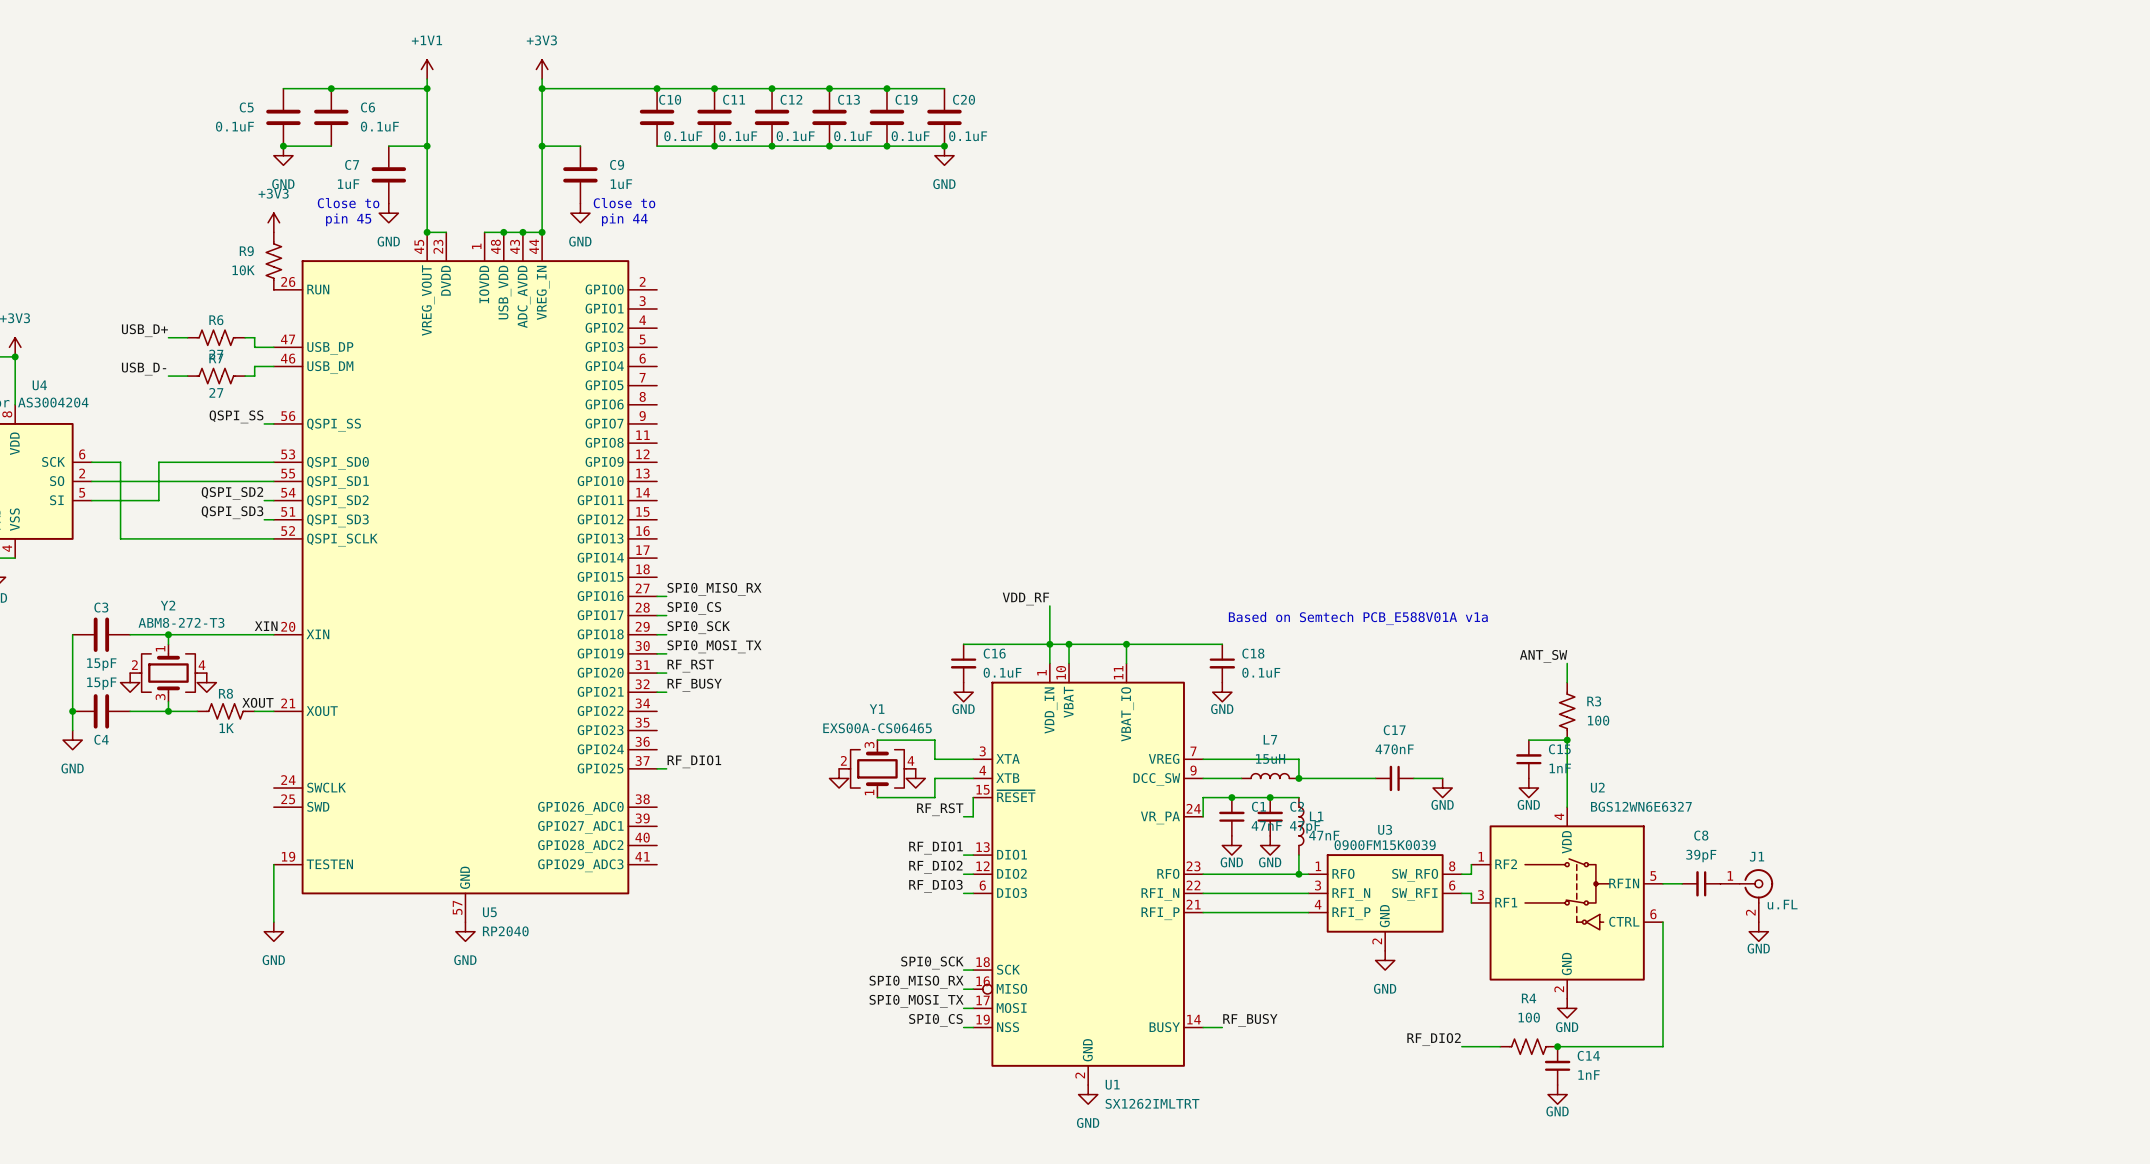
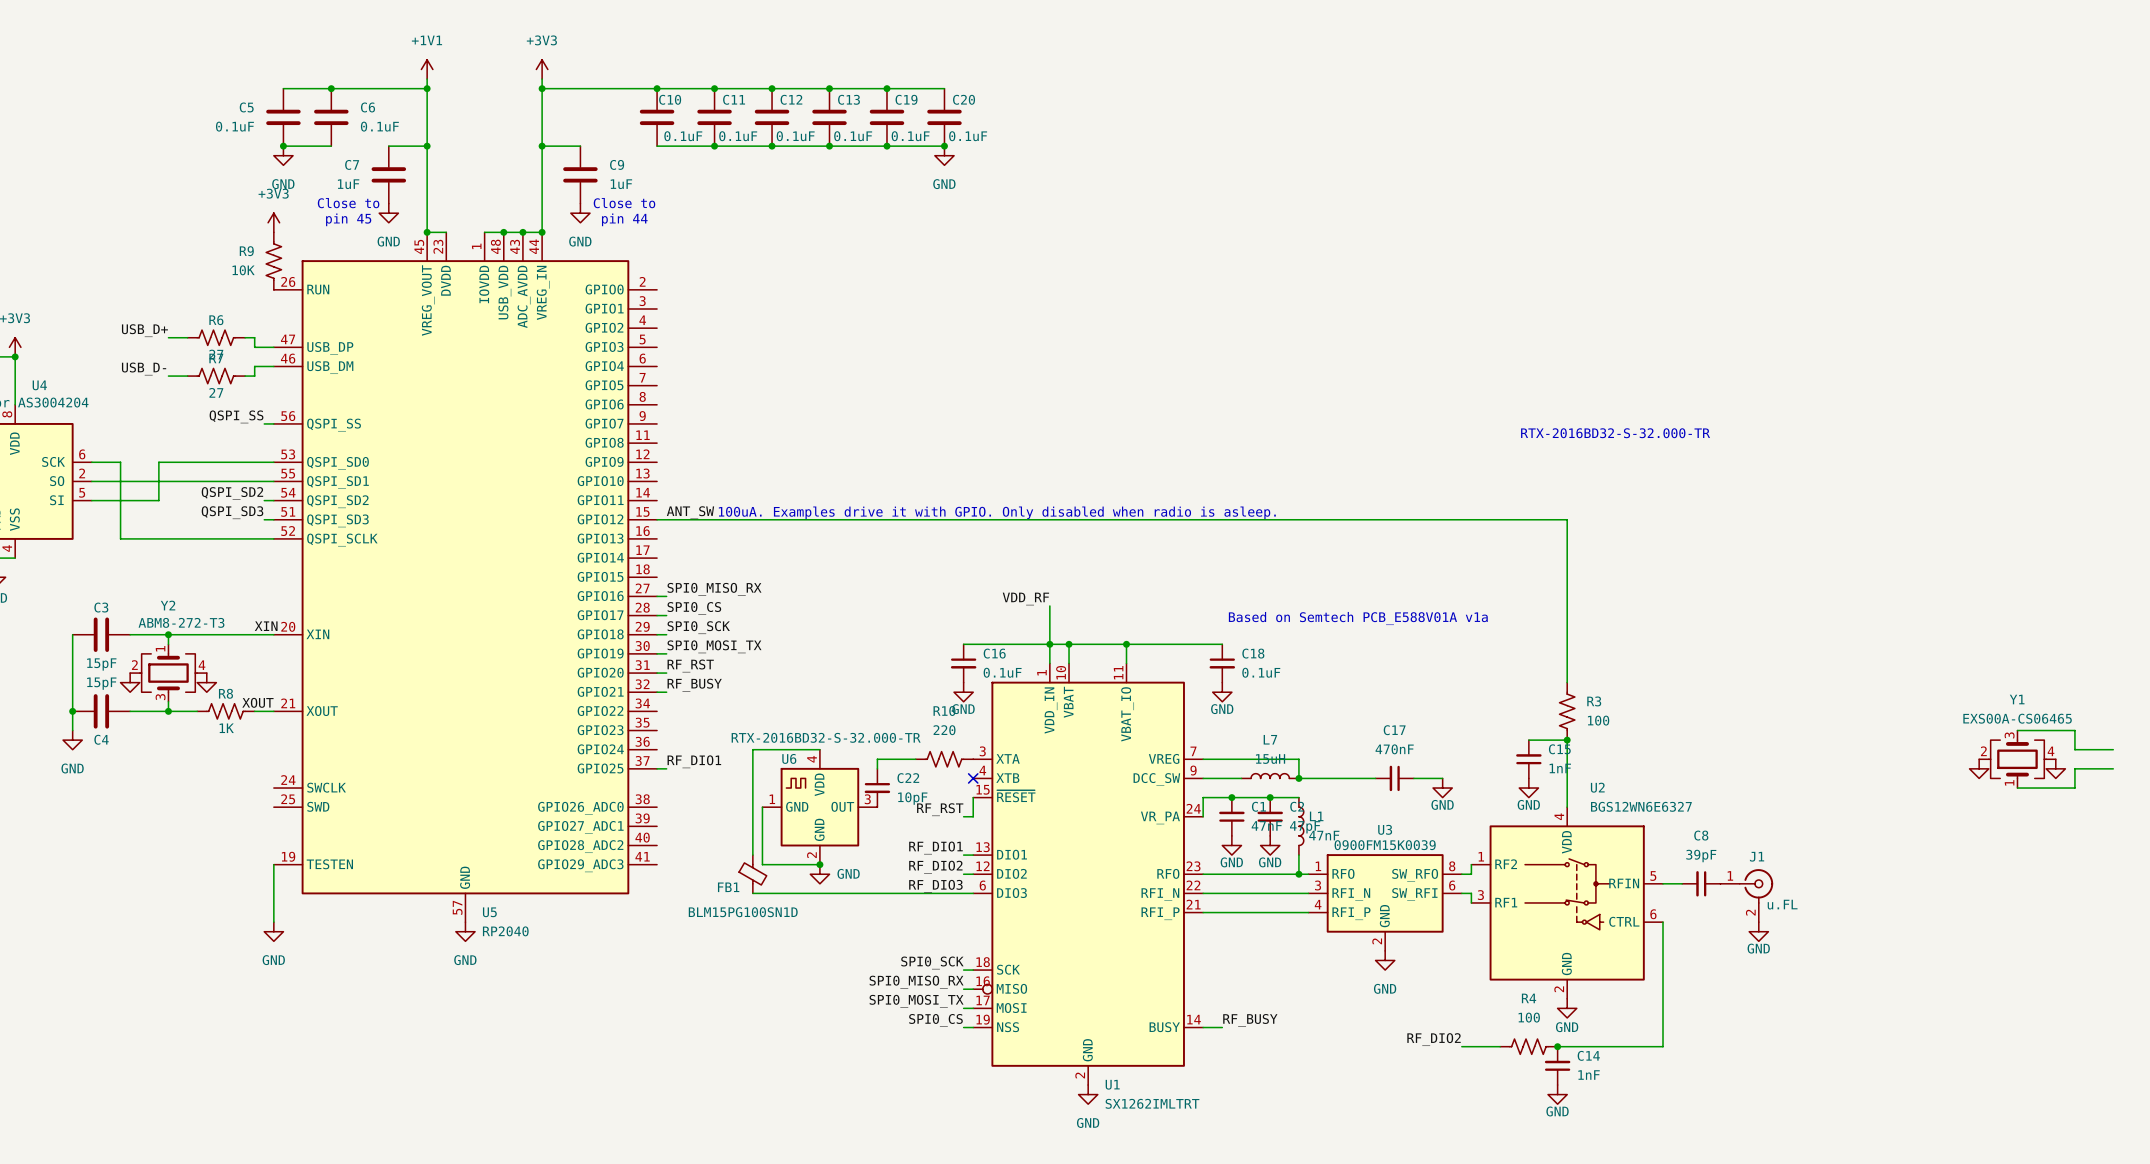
text: none -> RTX-2016BD32-S-32.000-TR (1615, 433)
label: none -> ANT_SW (690, 512)
text: none -> 100uA. Examples drive it with GPIO. Only disabled when radio is asleep. (997, 512)
wire: none -> (657, 519) (1567, 519) (1567, 663)
label: ANT_SW (1543, 656) -> none
wire: none -> (2017, 730) (2074, 730) (2074, 749) (2113, 749)
wire: (877, 740) (934, 740) (934, 759) (973, 759) -> none
wire: none -> (819, 749) (752, 749) (752, 855)
R10: none -> 220 (944, 759)
Y1 position: (877, 768) -> (2017, 759)
power symbol: none -> (1979, 768)
power symbol: none -> (2055, 768)
wire: none -> (2113, 768) (2074, 768) (2074, 788) (2017, 788)
power symbol: (839, 778) -> none
power symbol: (915, 778) -> none
wire: (973, 778) (934, 778) (934, 797) (877, 797) -> none
no-connect mark: none -> (973, 778)
C22: none -> 10pF (877, 788)
wire: none -> (762, 807) (762, 864) (819, 864)
U6: none -> RTX-2016BD32-S-32.000-TR (819, 807)
junction: none -> (819, 864)
FB1: none -> BLM15PG100SN1D (752, 874)
power symbol: none -> GND (819, 874)
wire: none -> (752, 893) (963, 893)

